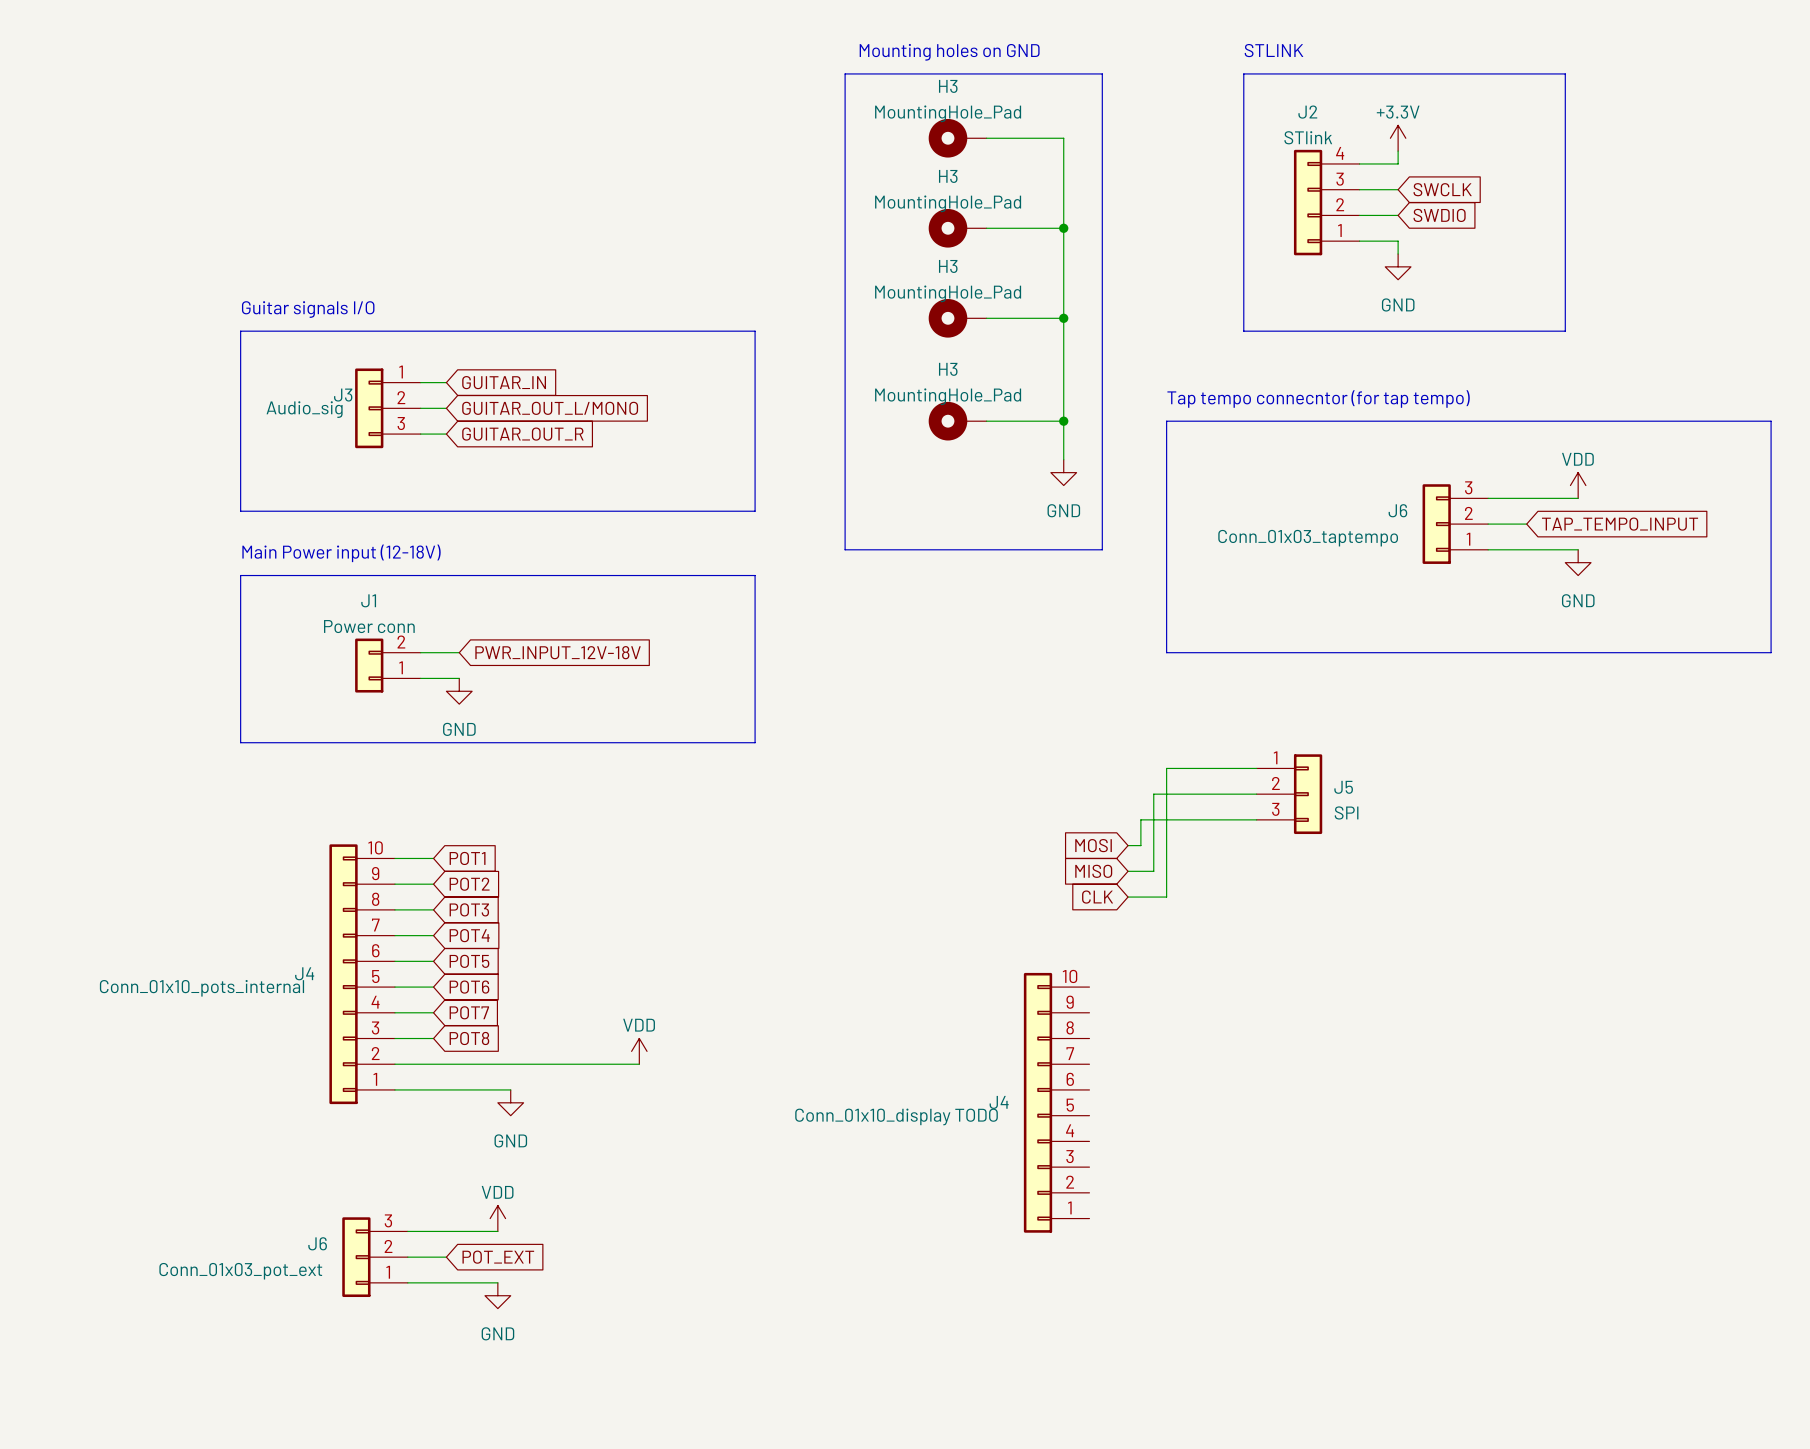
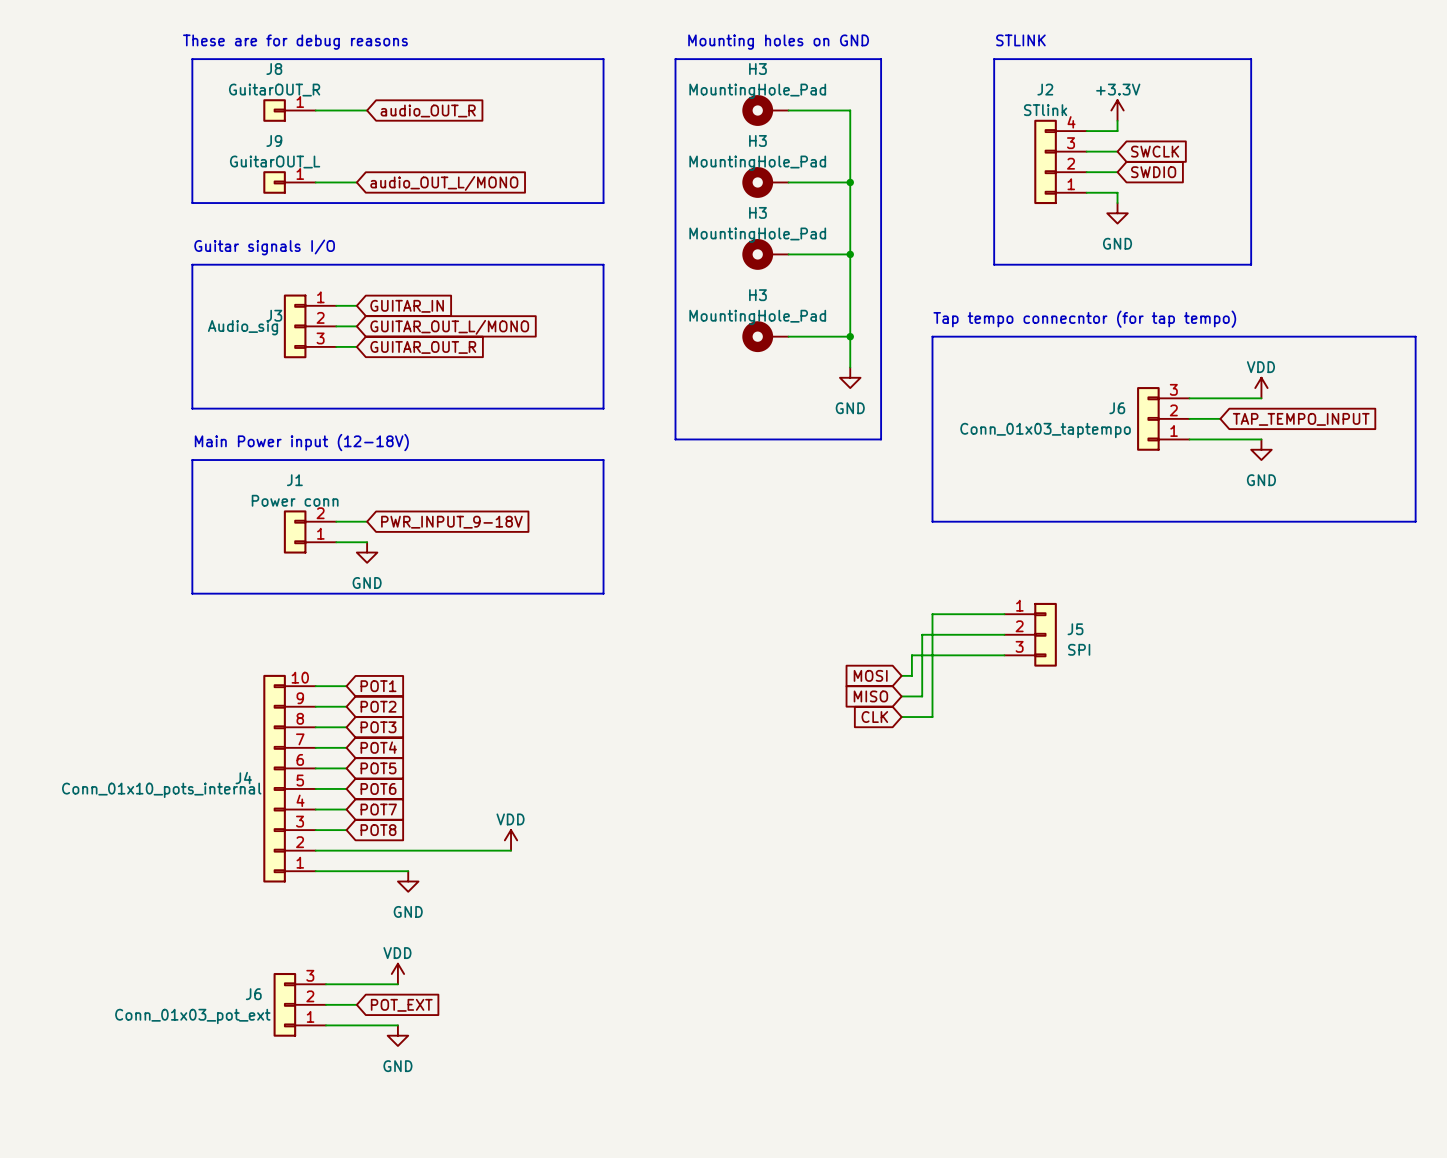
text: none -> These are for debug reasons (295, 42)
line: none -> (192, 59) (603, 59) (603, 203) (192, 203) (192, 59)
J8: none -> GuitarOUT_R (289, 110)
wire: none -> (315, 110) (367, 110)
global label: none -> audio_OUT_R (428, 111)
J9: none -> GuitarOUT_L (289, 182)
wire: none -> (315, 182) (356, 182)
global label: none -> audio_OUT_L/MONO (444, 183)
global label: PWR_INPUT_12V-18V (558, 652) -> PWR_INPUT_9-18V (451, 522)
J4: Conn_01x10_display TODO (1056, 1102) -> none

